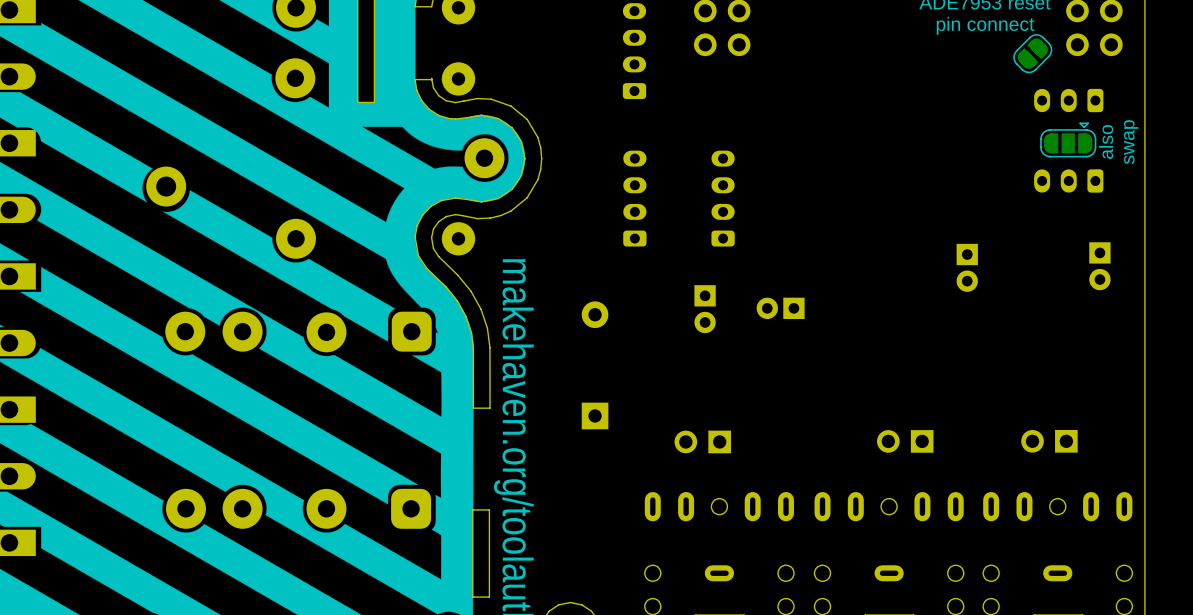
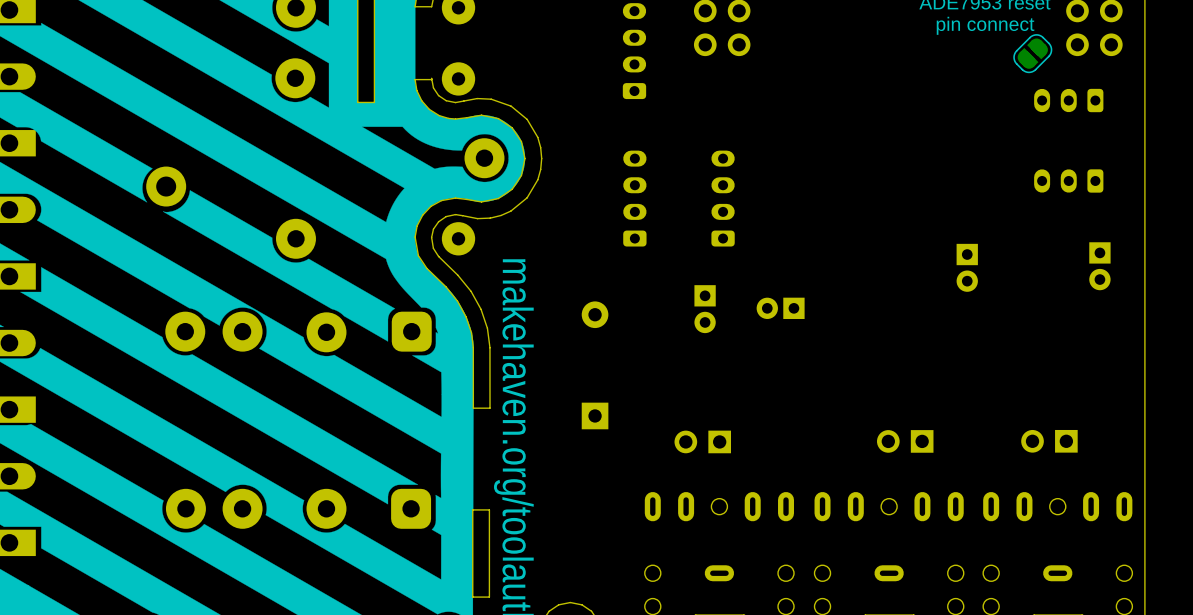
part: (1068, 139) -> none
text: also (1106, 141) -> none
text: swap (1131, 142) -> none

